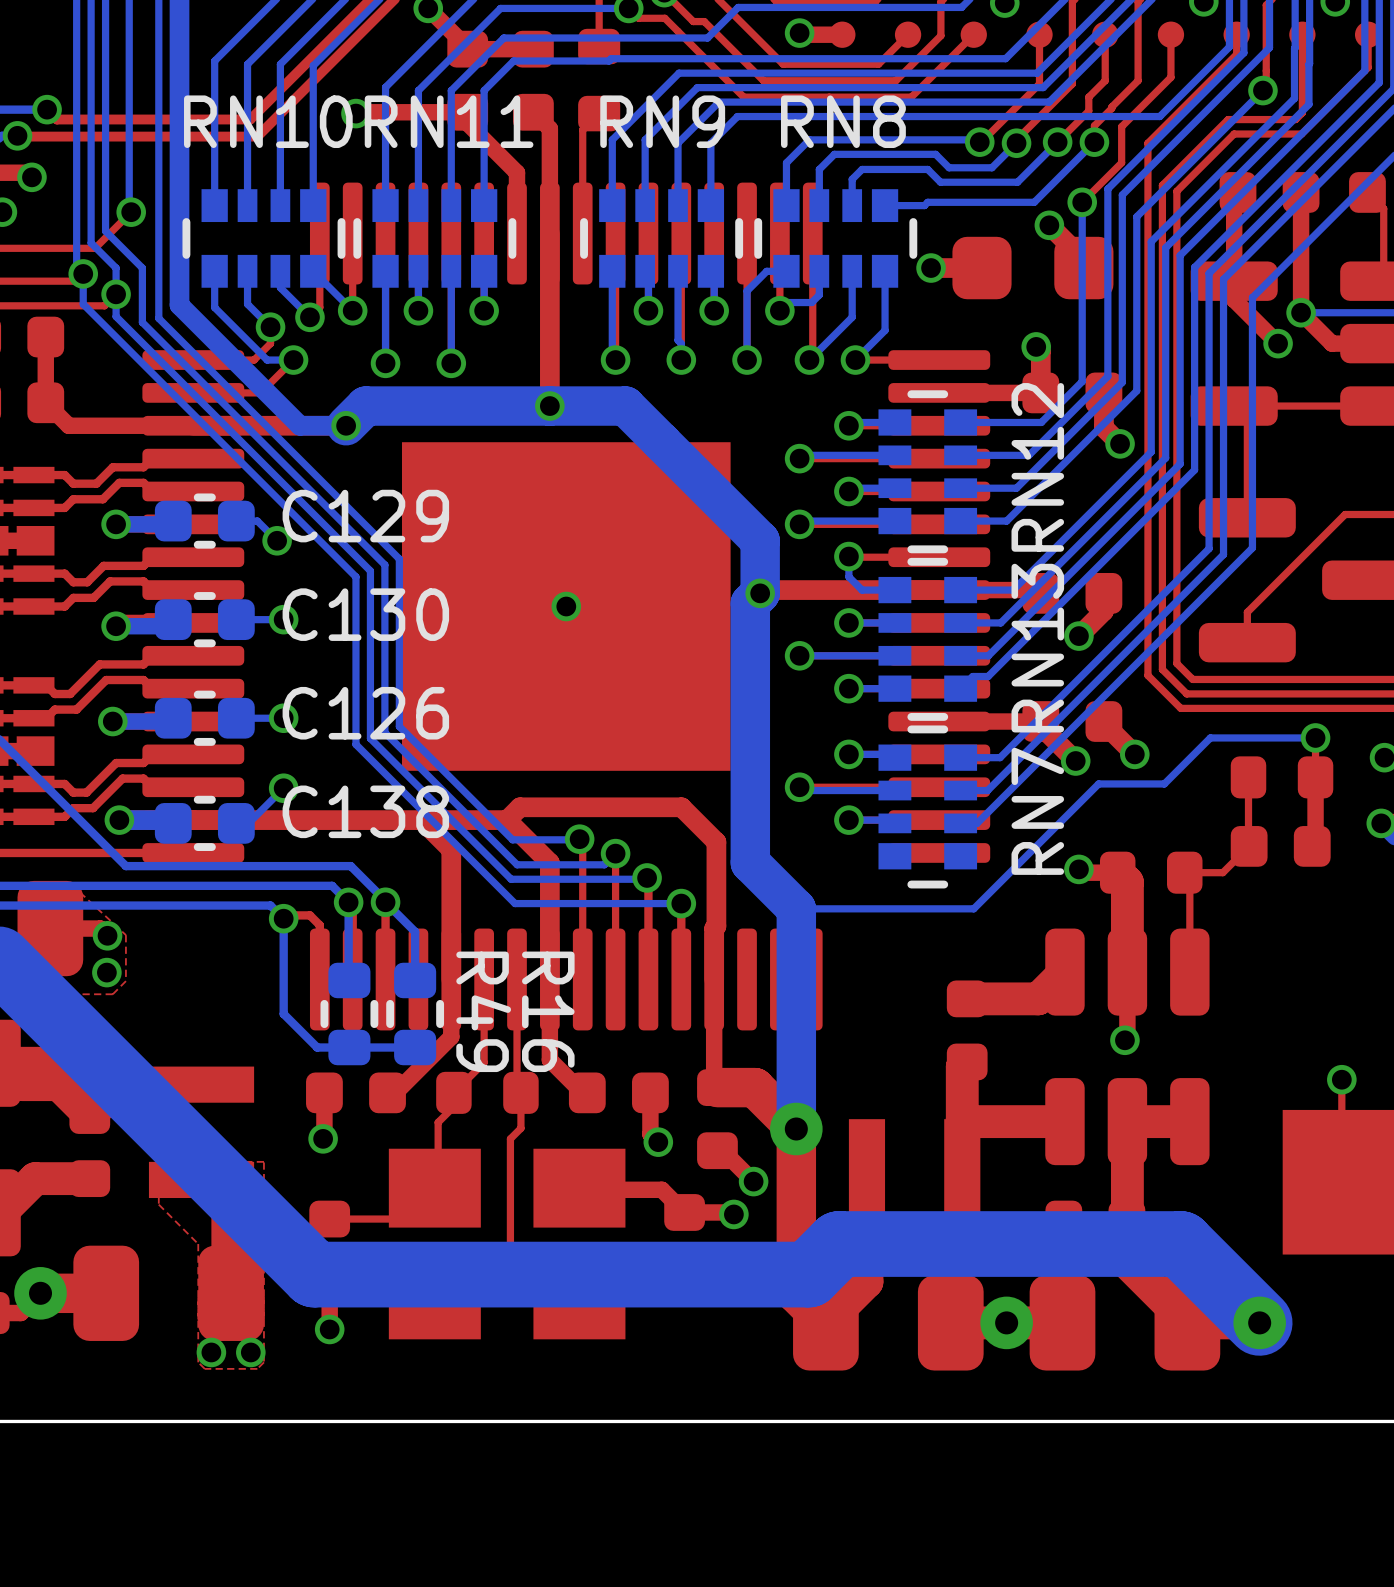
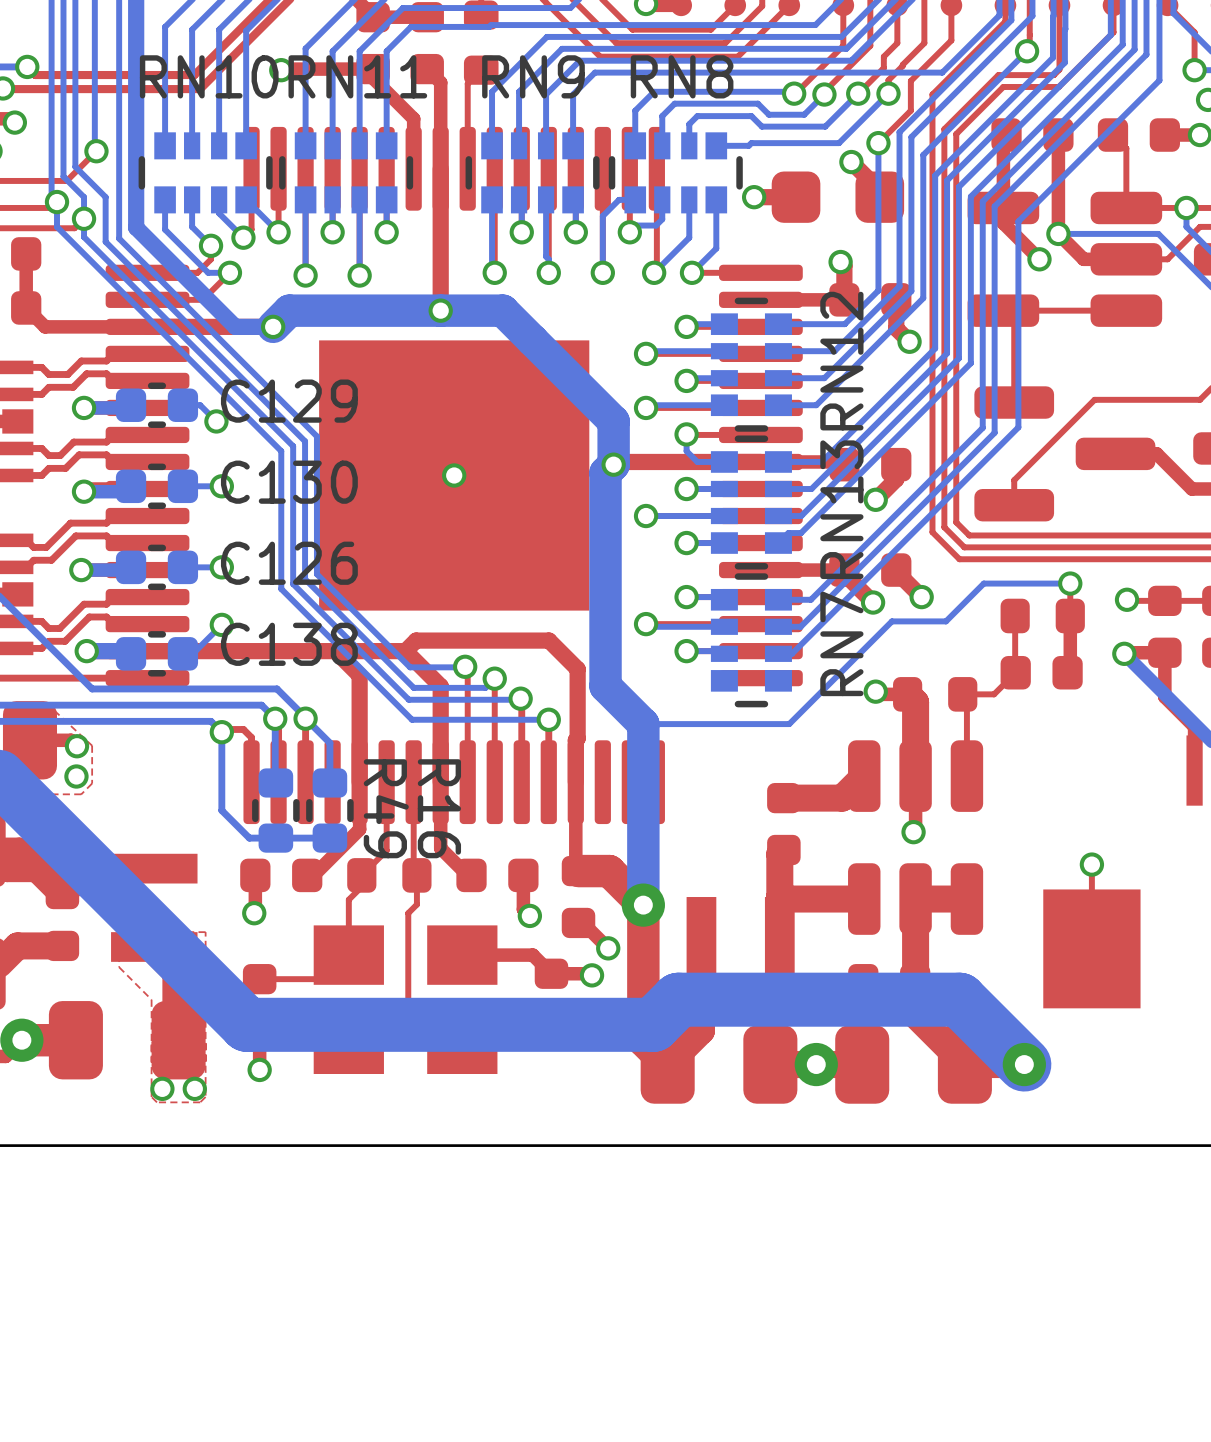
part footprint: [388, 1148, 626, 1340] -> [313, 925, 498, 1075]

